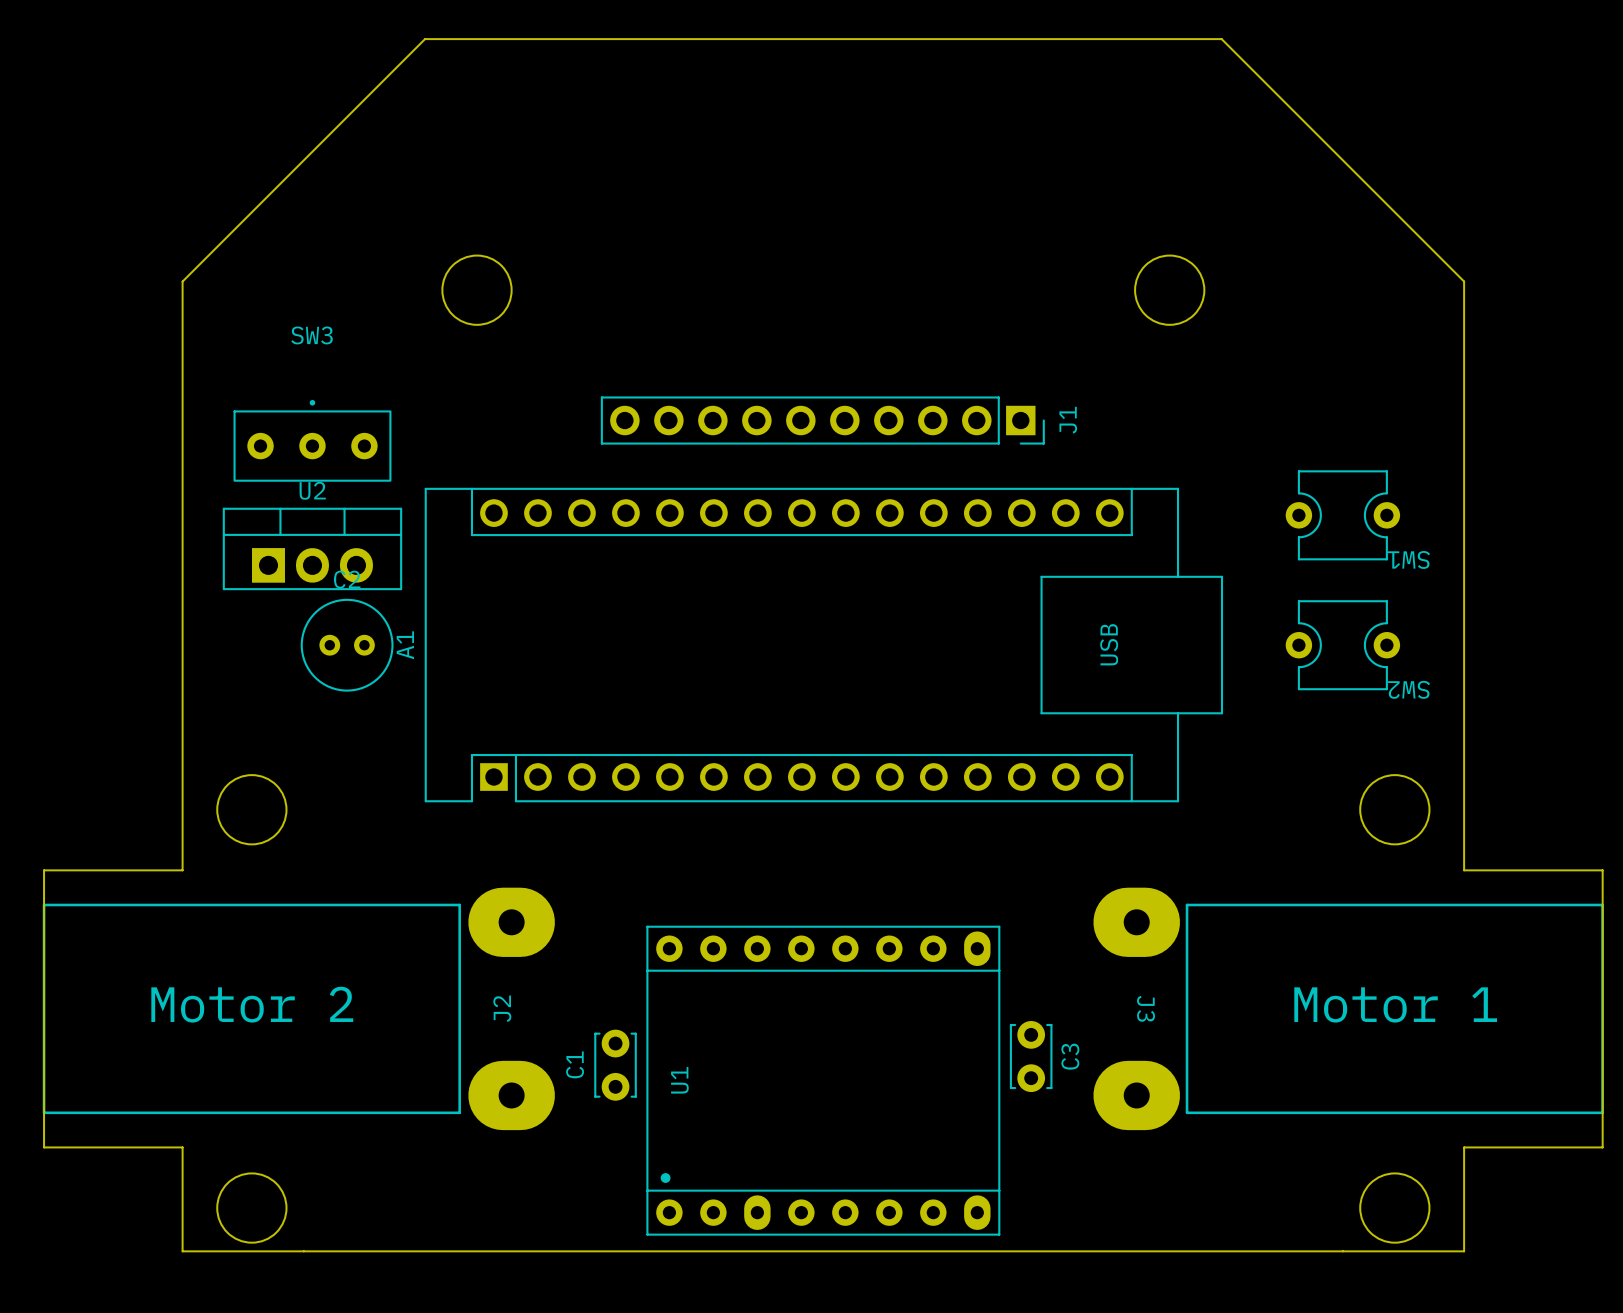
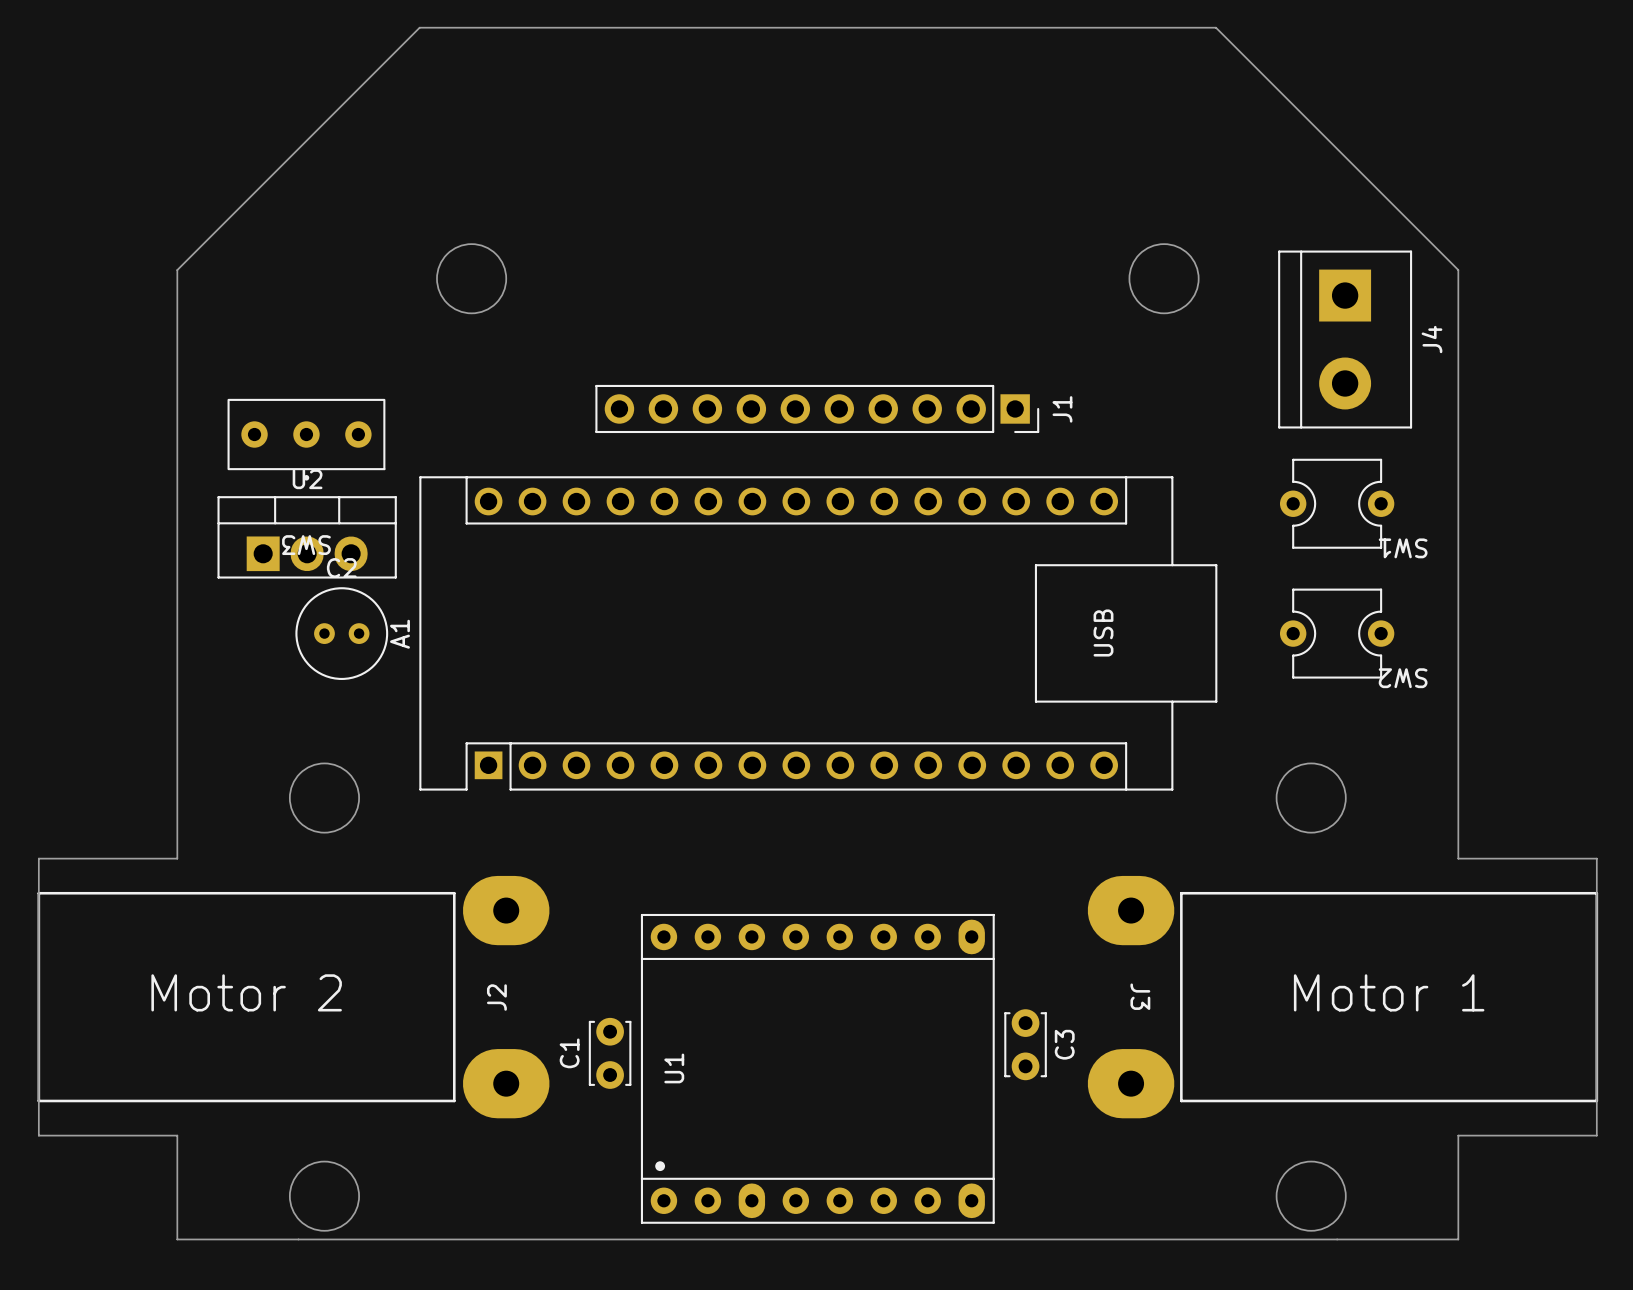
J4: none -> (1345, 339)
SW3 rotation: 0° (312, 440) -> 180° (306, 439)
round board edge position: (251, 809) -> (324, 798)
round board edge position: (1394, 809) -> (1311, 798)
round board edge position: (251, 1208) -> (324, 1196)
round board edge position: (1394, 1208) -> (1311, 1196)

